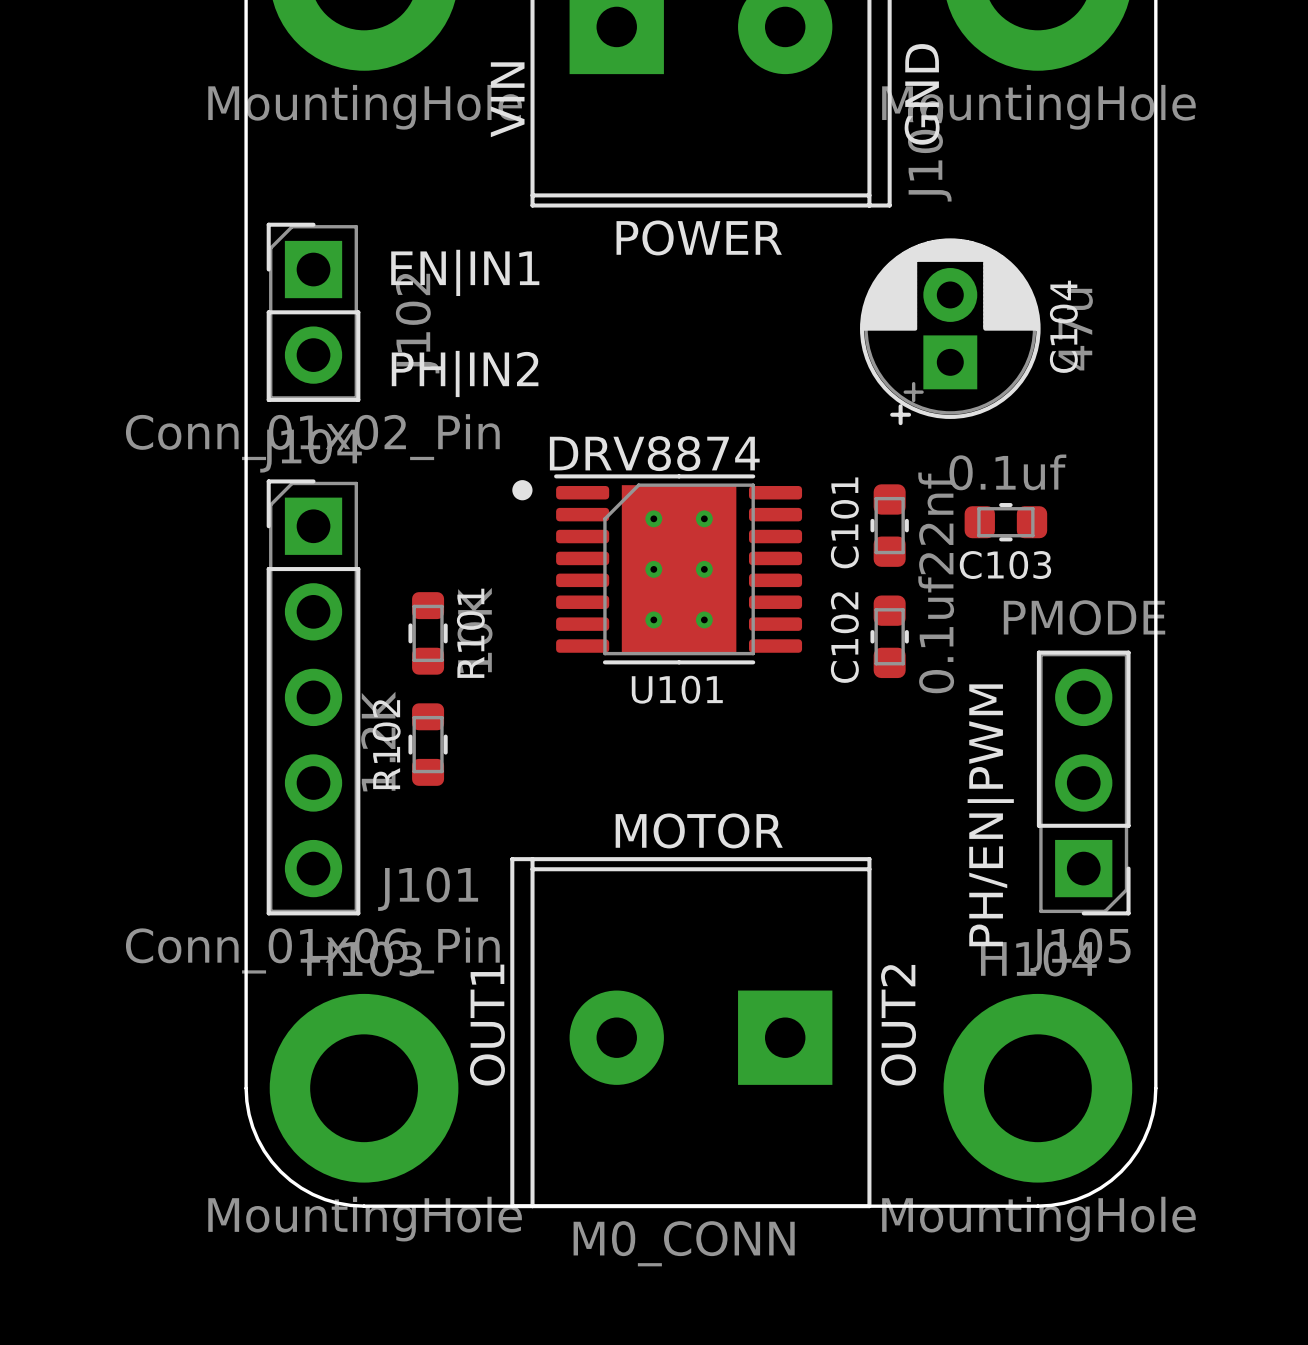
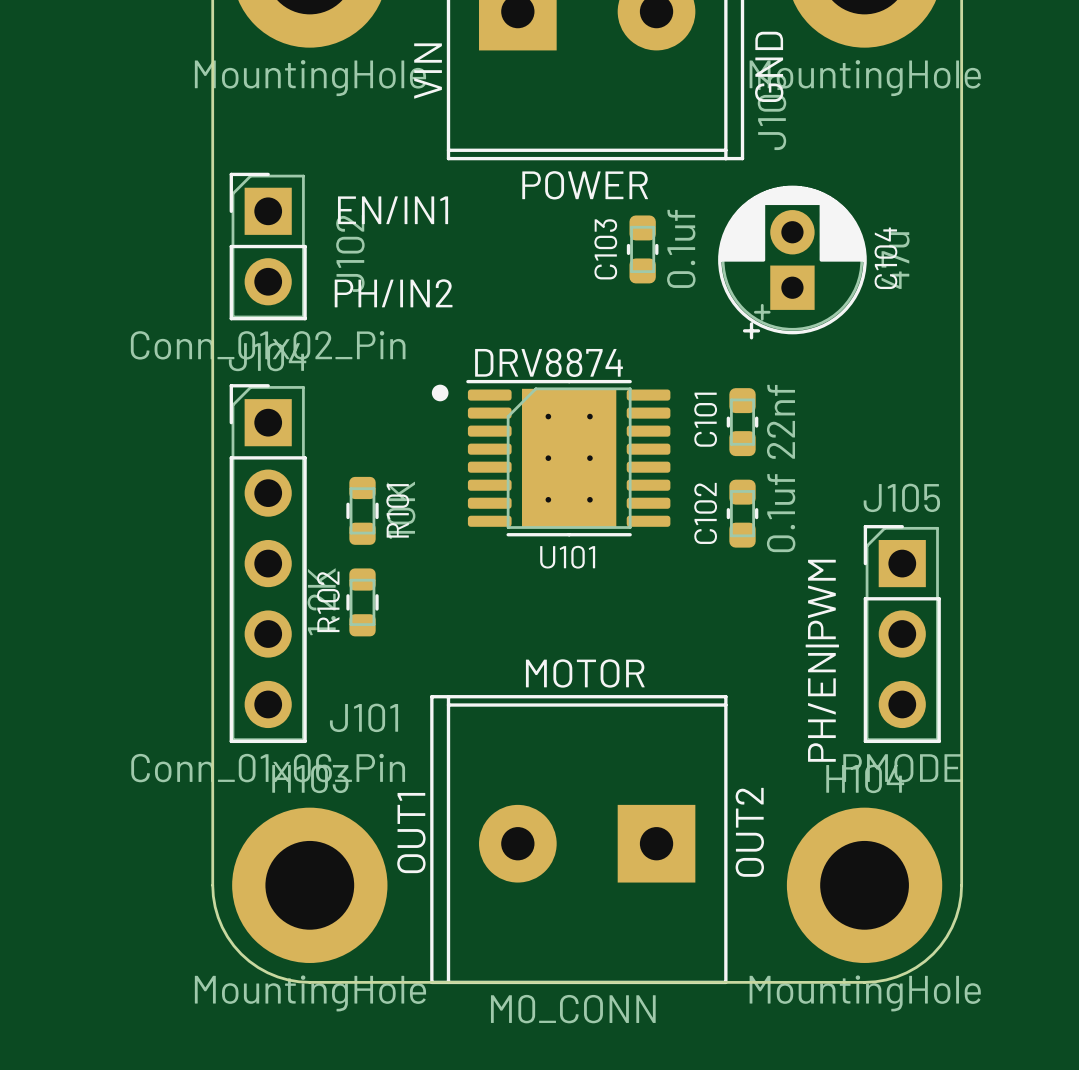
J102 text: EN|IN1 (465, 272) -> EN/IN1 (393, 210)
J102 text: PH|IN2 (465, 373) -> PH/IN2 (393, 293)
C103 rotation: 0° (1005, 522) -> 90° clockwise (642, 249)
C103 position: (1005, 522) -> (642, 249)
J105 rotation: 0° (1083, 782) -> 180° (902, 634)

